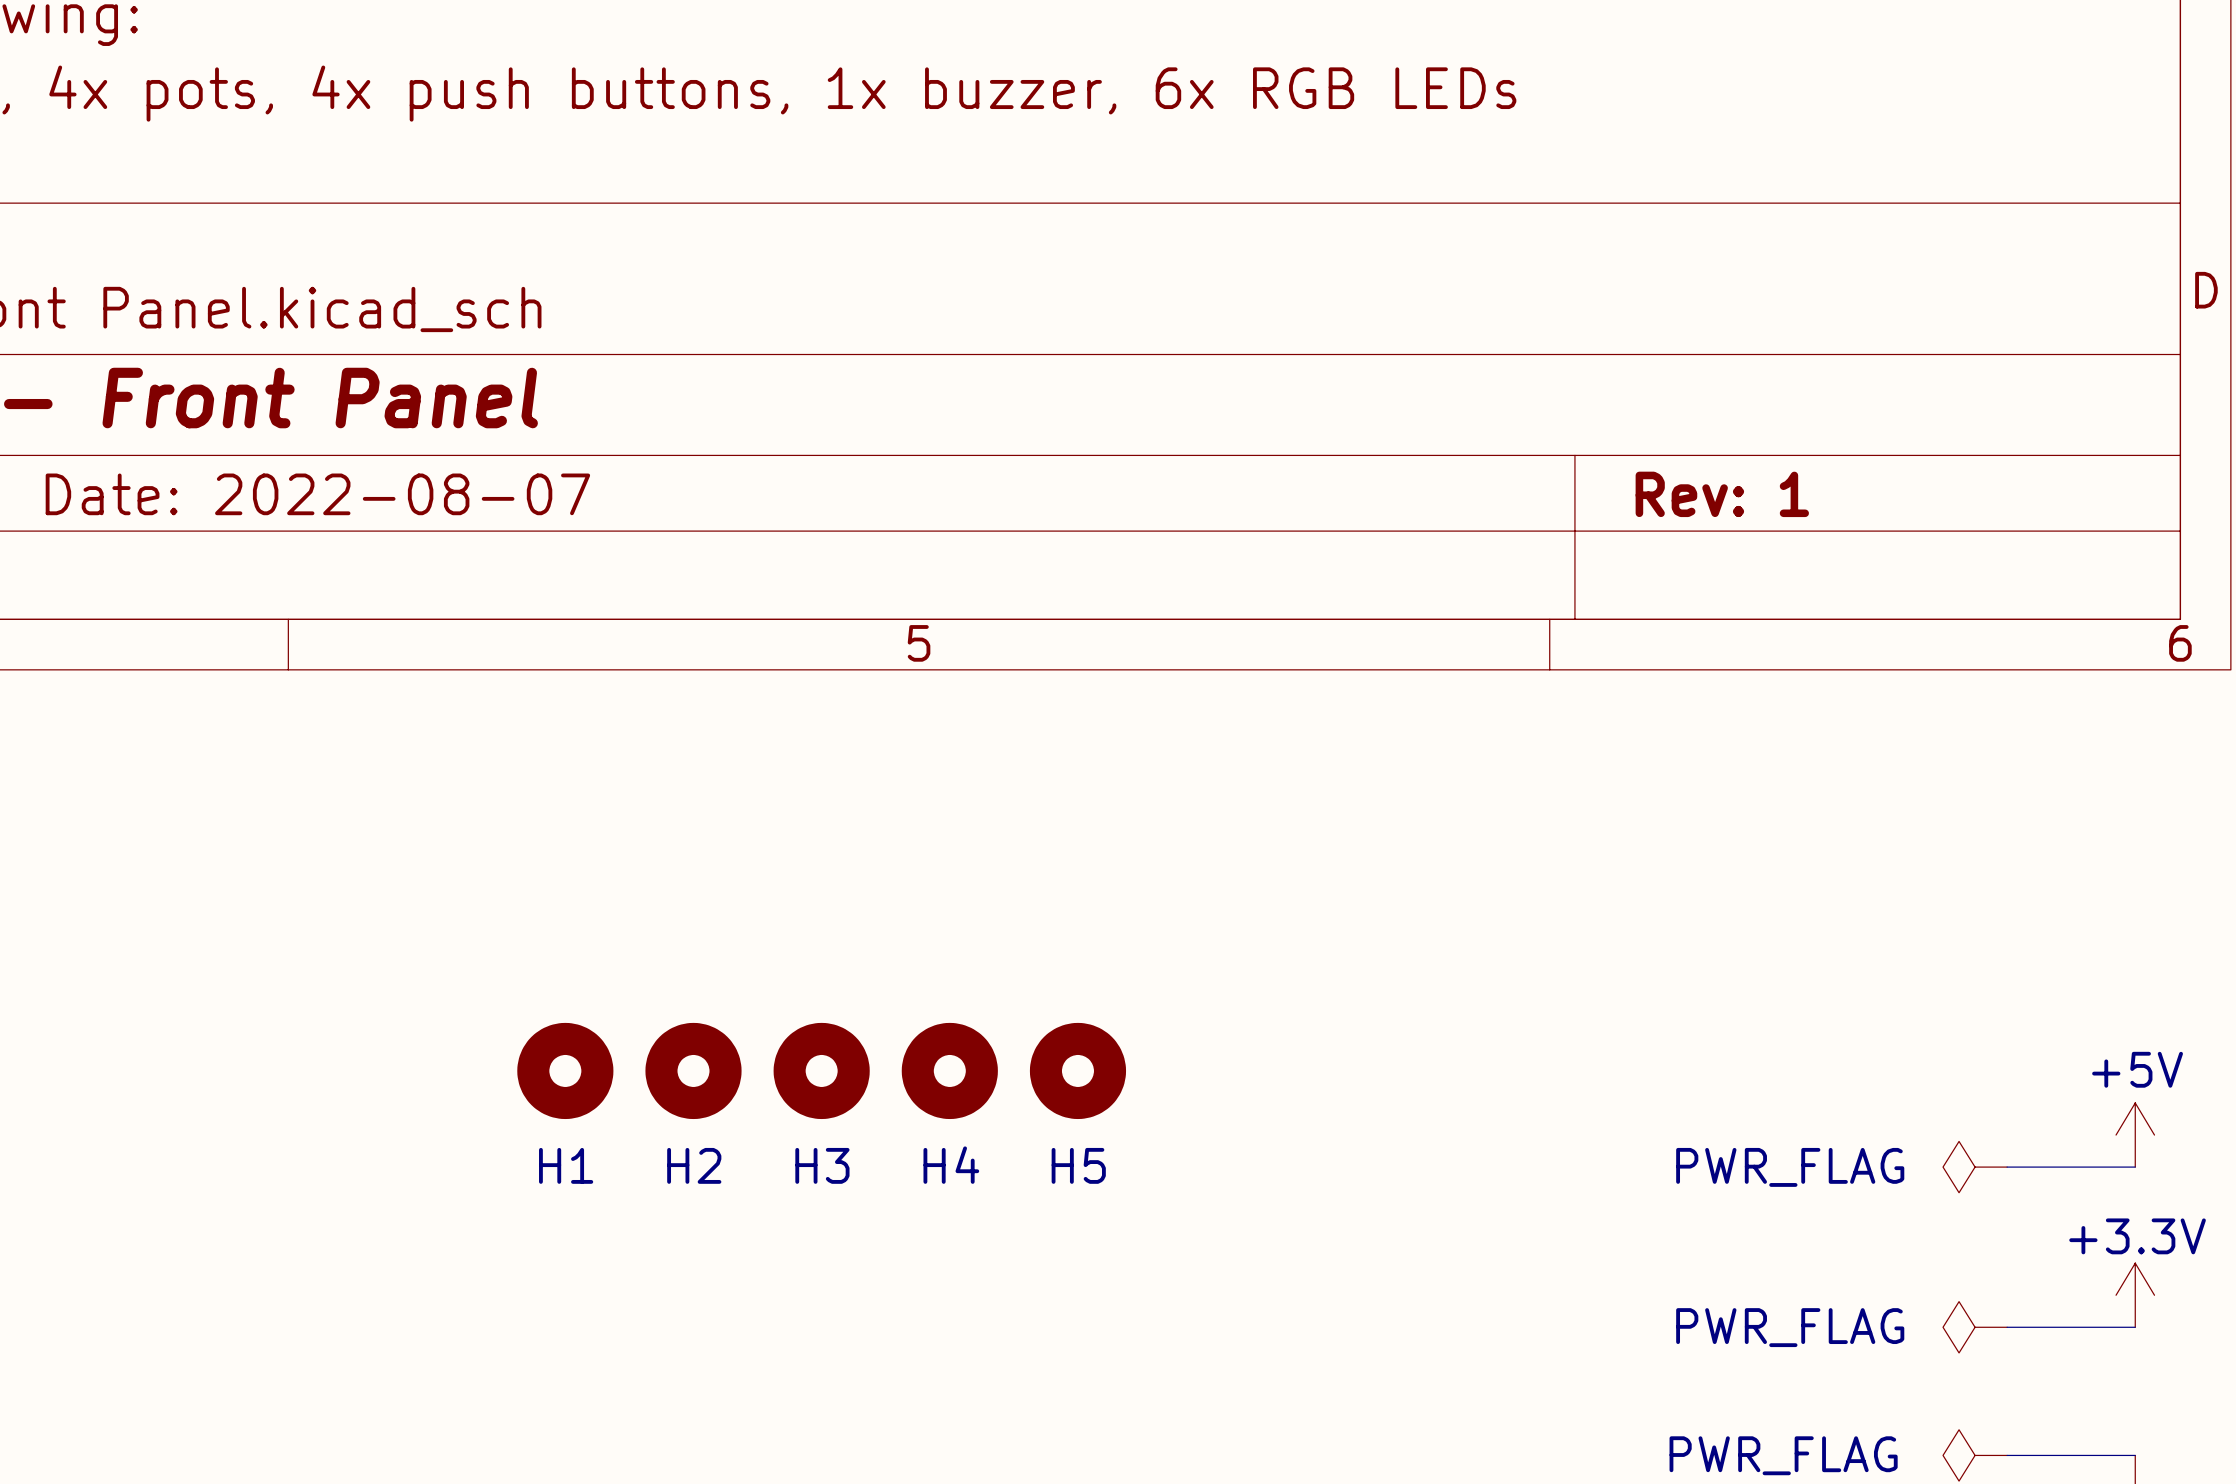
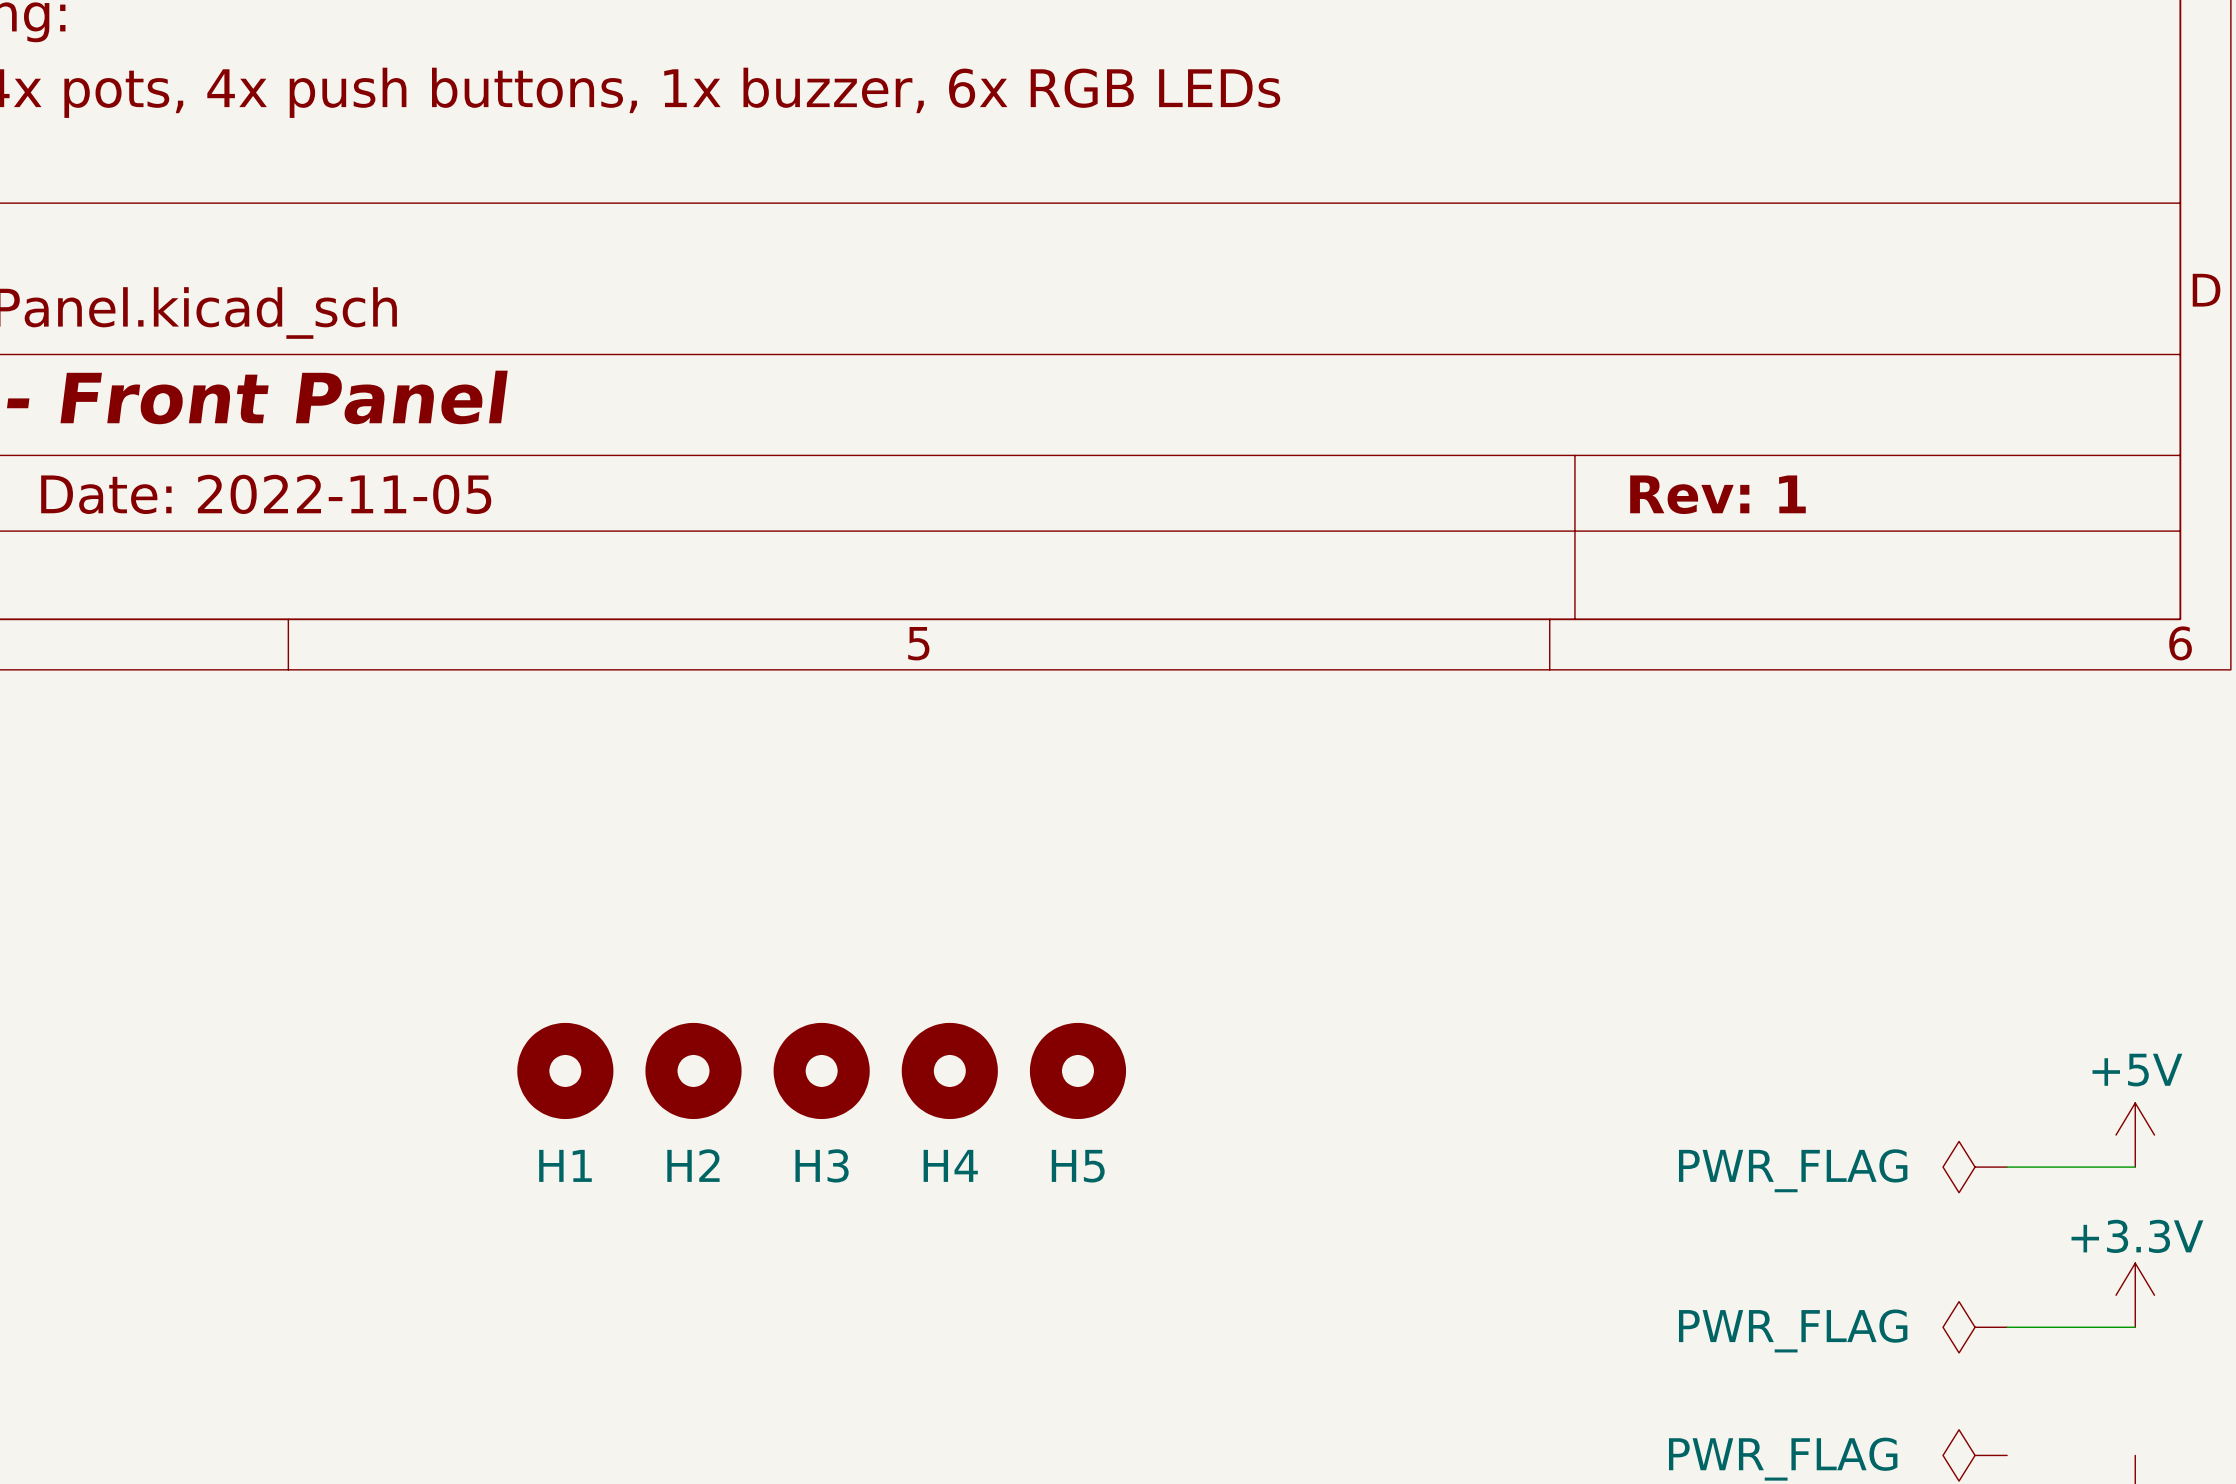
title block: Date: 2022-08-07 (317, 494) -> Date: 2022-11-05 (266, 494)
wire: (2007, 1455) (2135, 1455) -> none

